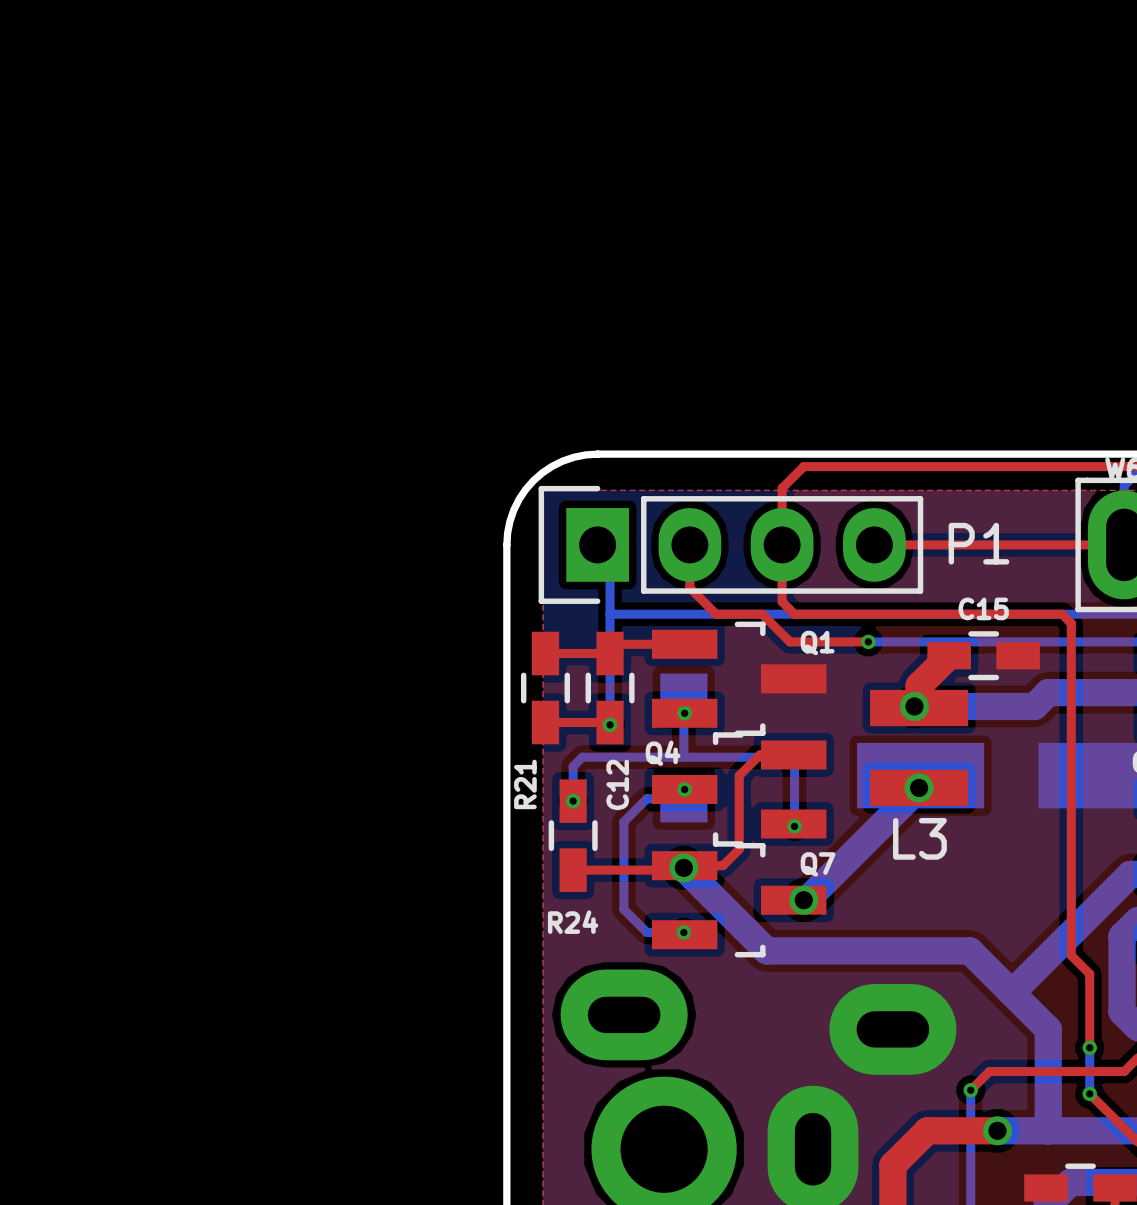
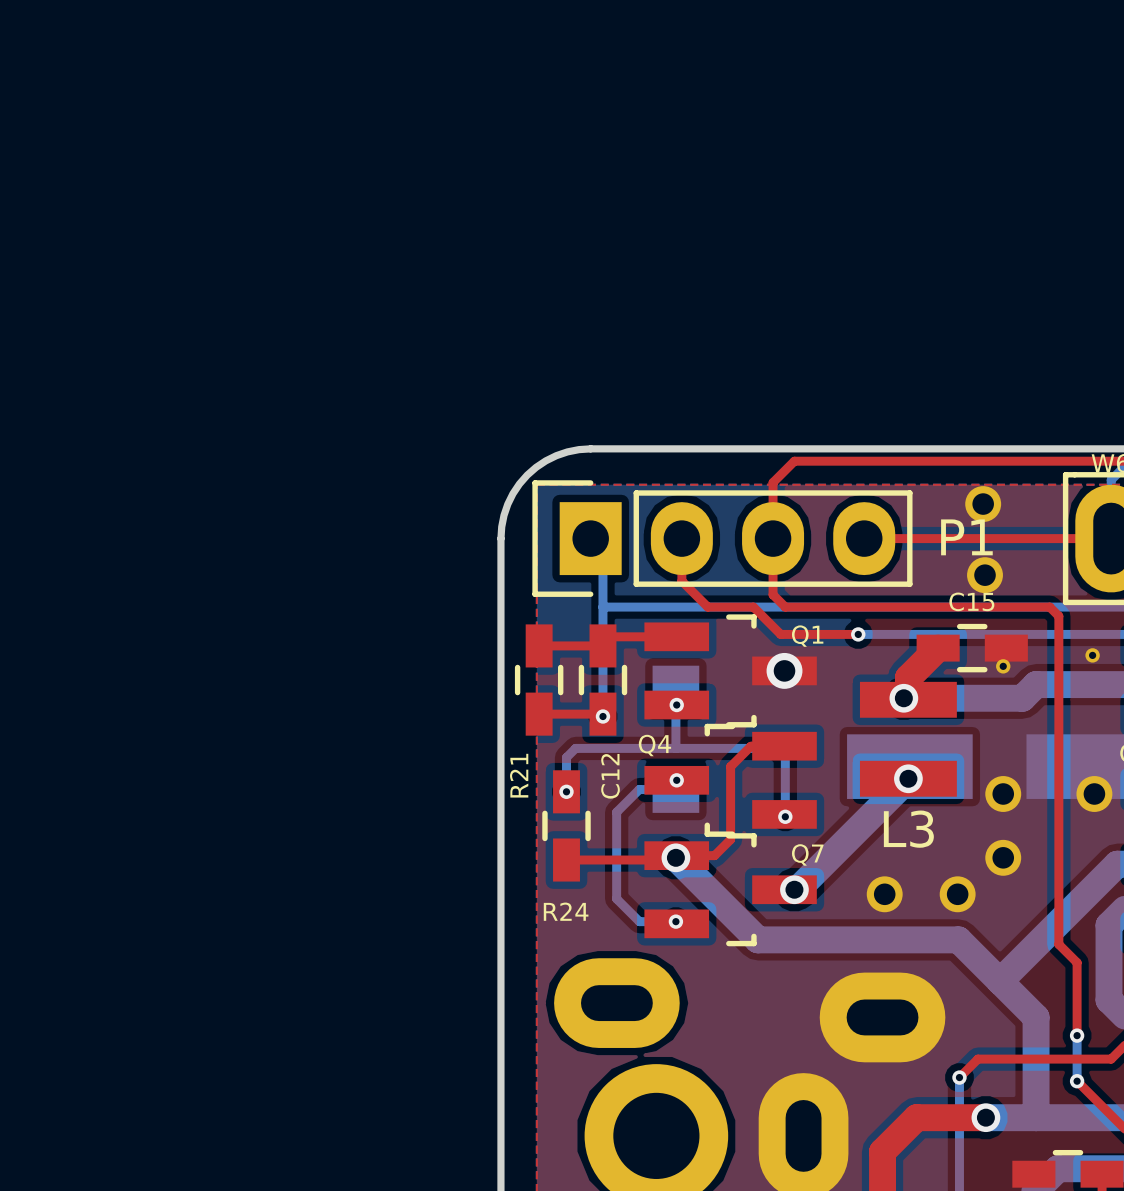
part: none -> (983, 504)
part: none -> (985, 575)
part: none -> (1092, 655)
part: none -> (1003, 666)
via: none -> (784, 670)
part: none -> (1003, 794)
part: none -> (1094, 794)
part: none -> (1003, 857)
part: none -> (884, 894)
part: none -> (957, 894)

